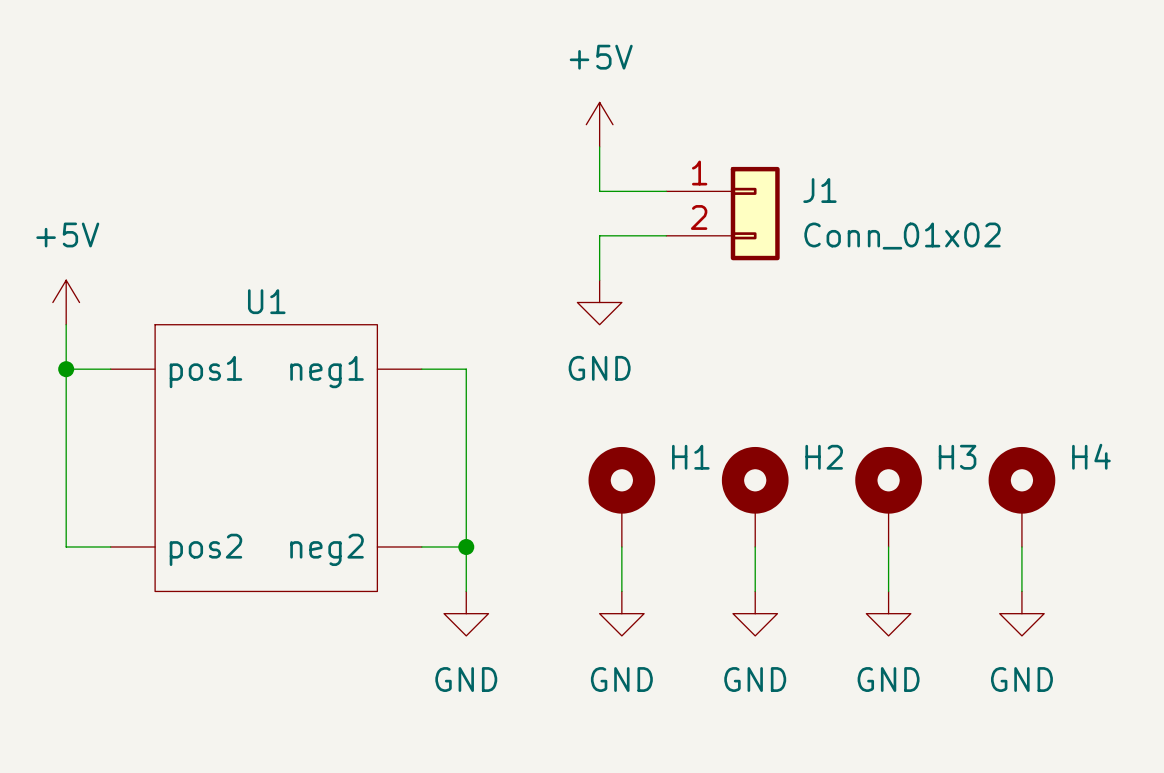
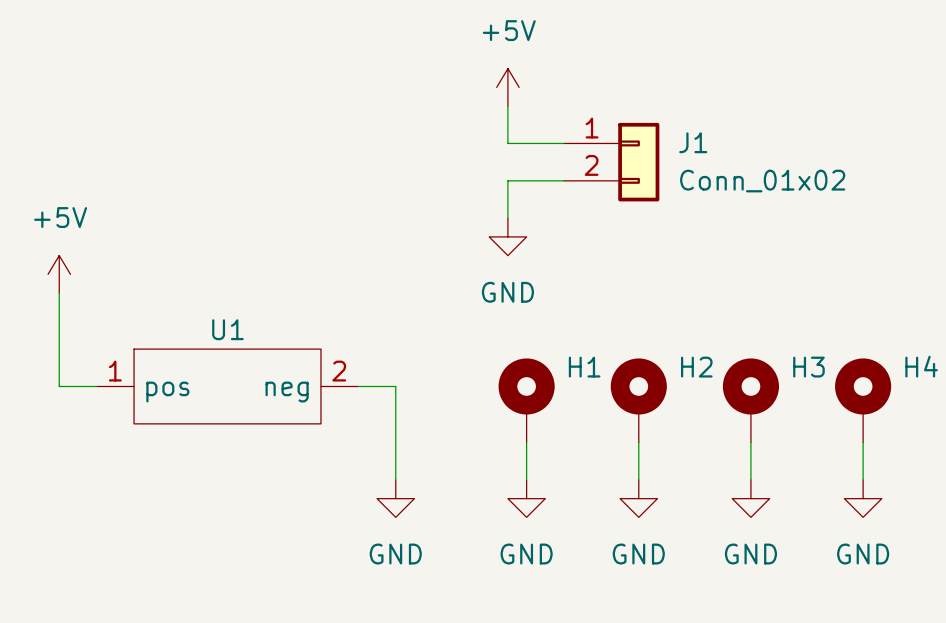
U1 name position: U1 (266, 301) -> U1 (227, 329)
power symbol position: +5V (66, 302) -> +5V (59, 274)
wire: (66, 324) (66, 369) (110, 369) -> none
U1 symbol: [110, 324, 422, 592] -> [96, 349, 359, 424]
junction: (66, 369) -> none
wire: (421, 369) (466, 369) (466, 480) -> (358, 386) (395, 386)
wire: (66, 480) (66, 546) (110, 546) -> (59, 386) (96, 386)
wire: (421, 546) (466, 546) -> none
junction: (466, 546) -> none

